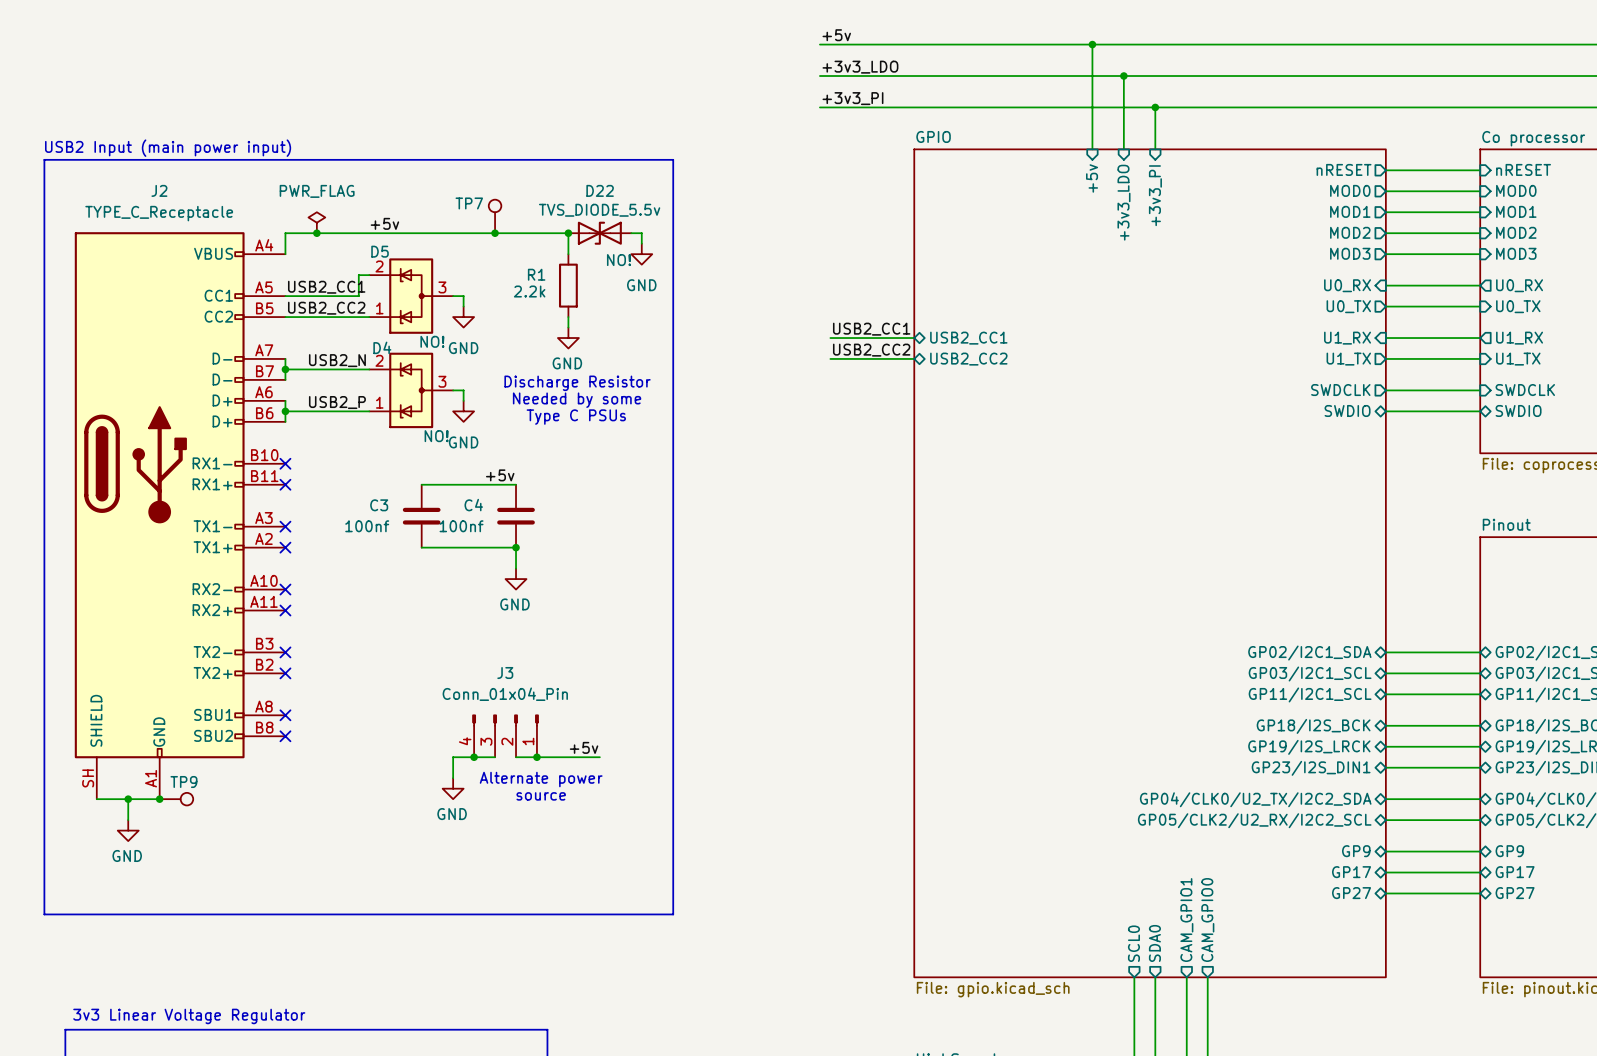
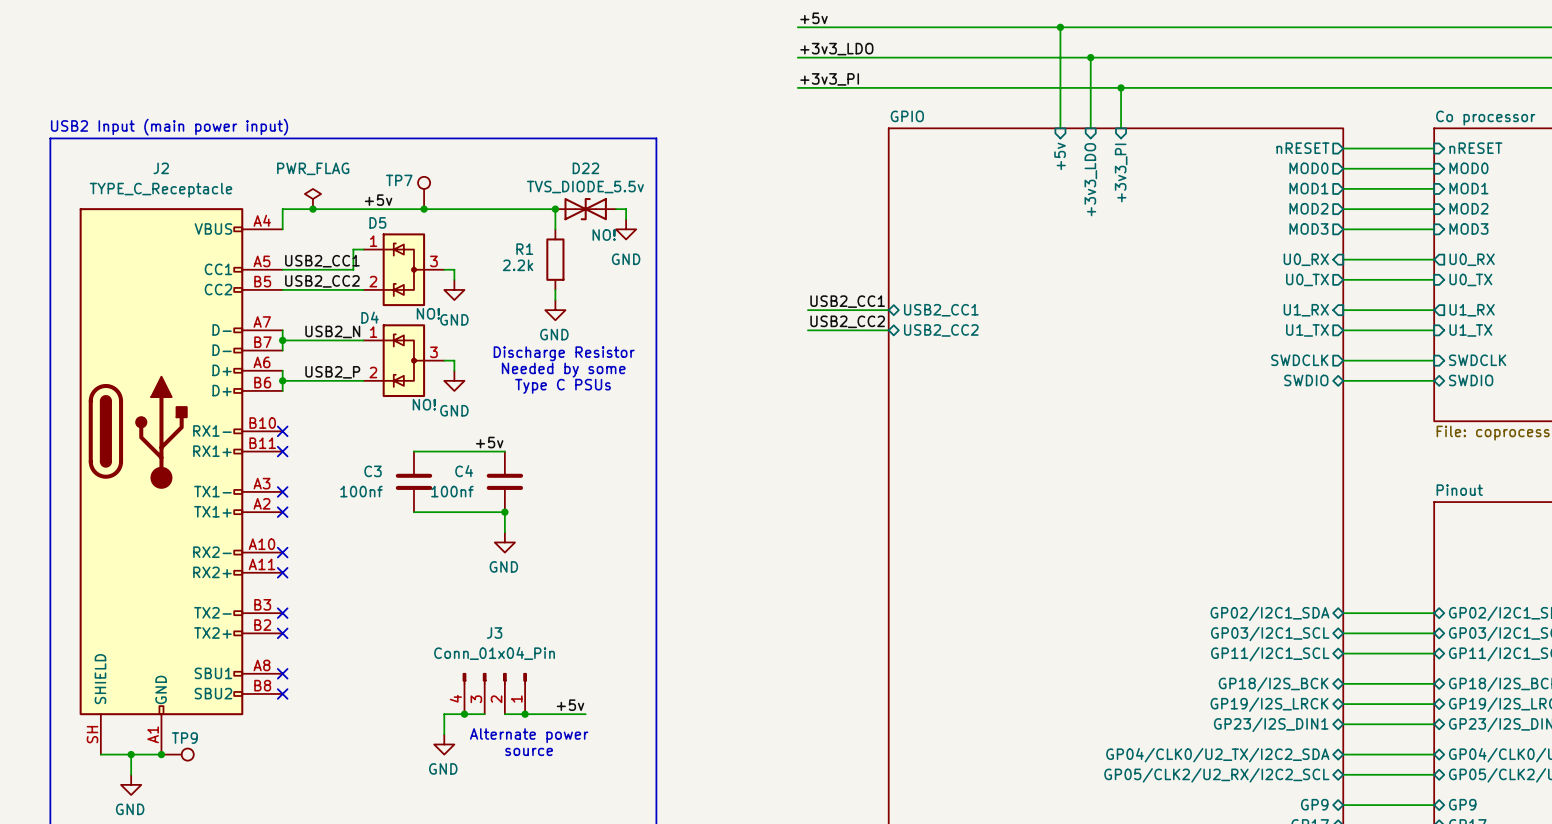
TP7 position: (495, 216) -> (424, 192)
junction: none -> (424, 209)
junction: (495, 233) -> none
D5 flip: as is (411, 296) -> up-down (403, 269)
D4 flip: as is (411, 390) -> up-down (403, 360)

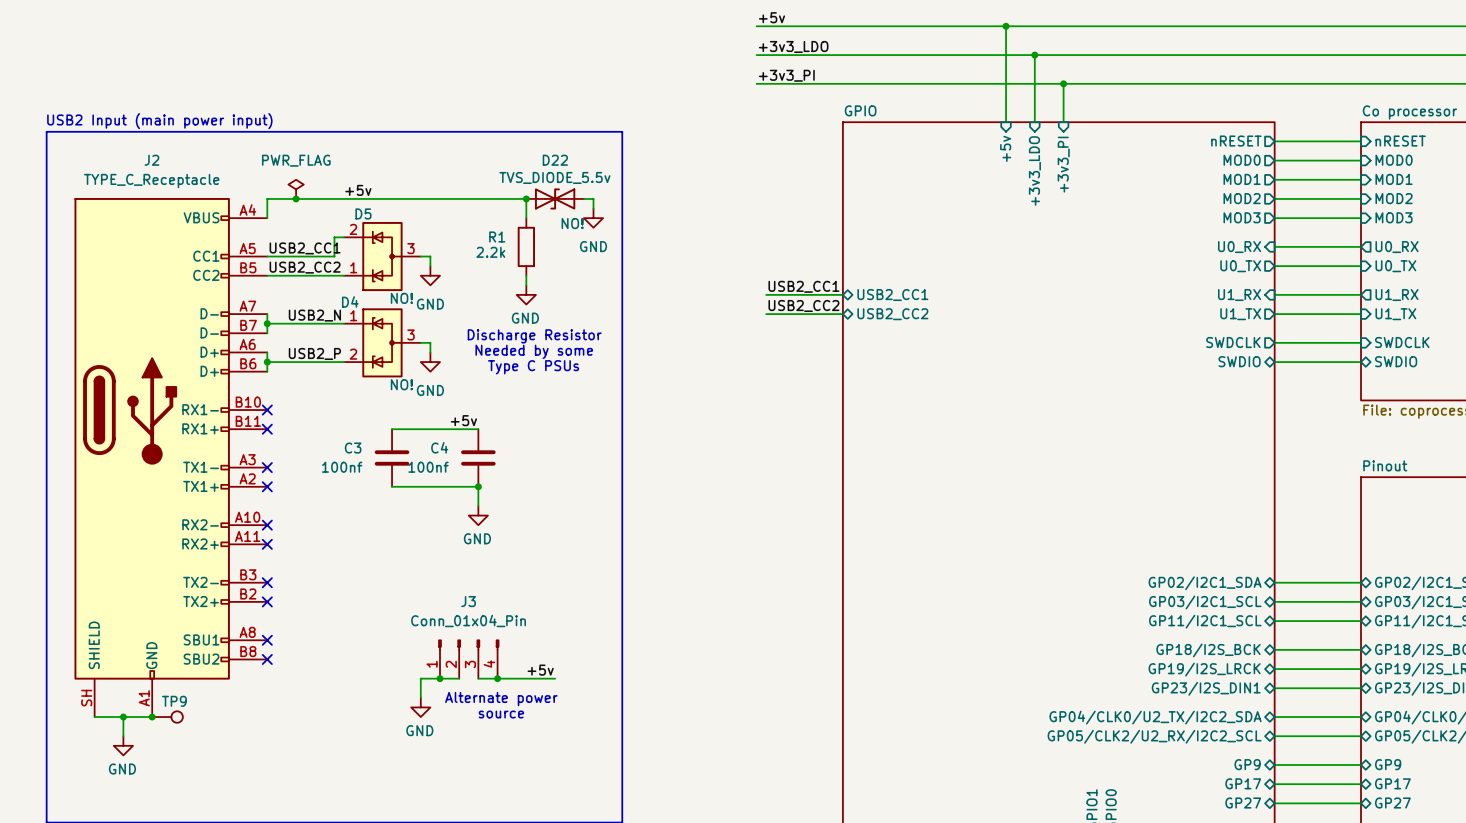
TP7: (424, 192) -> none
junction: (424, 209) -> none
D5 flip: as is (403, 269) -> up-down (382, 256)
J3 flip: as is (494, 678) -> left-right (468, 645)

